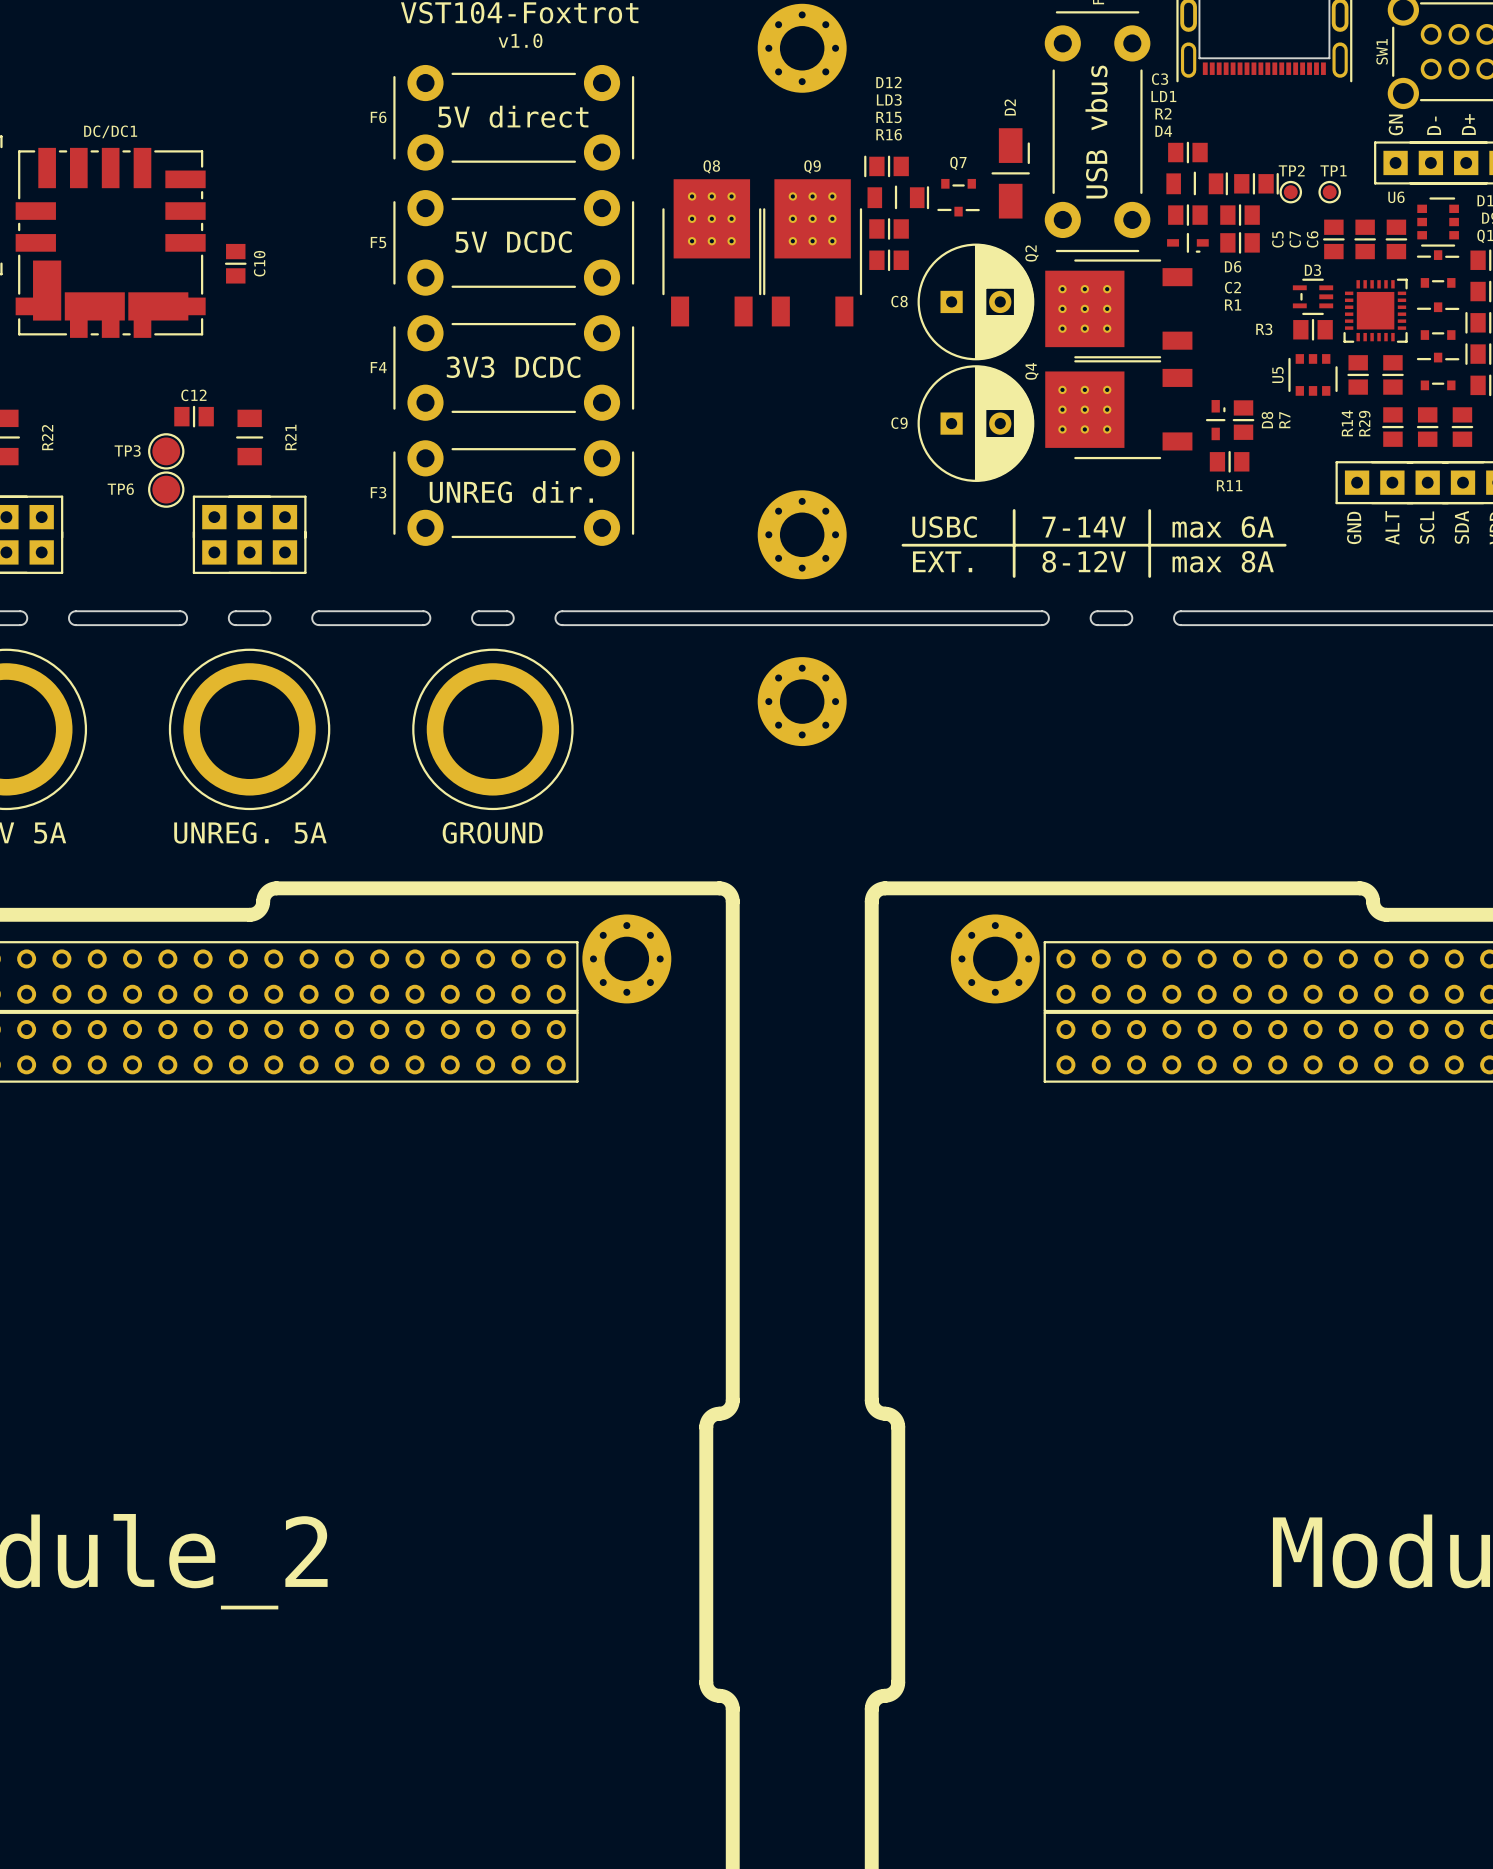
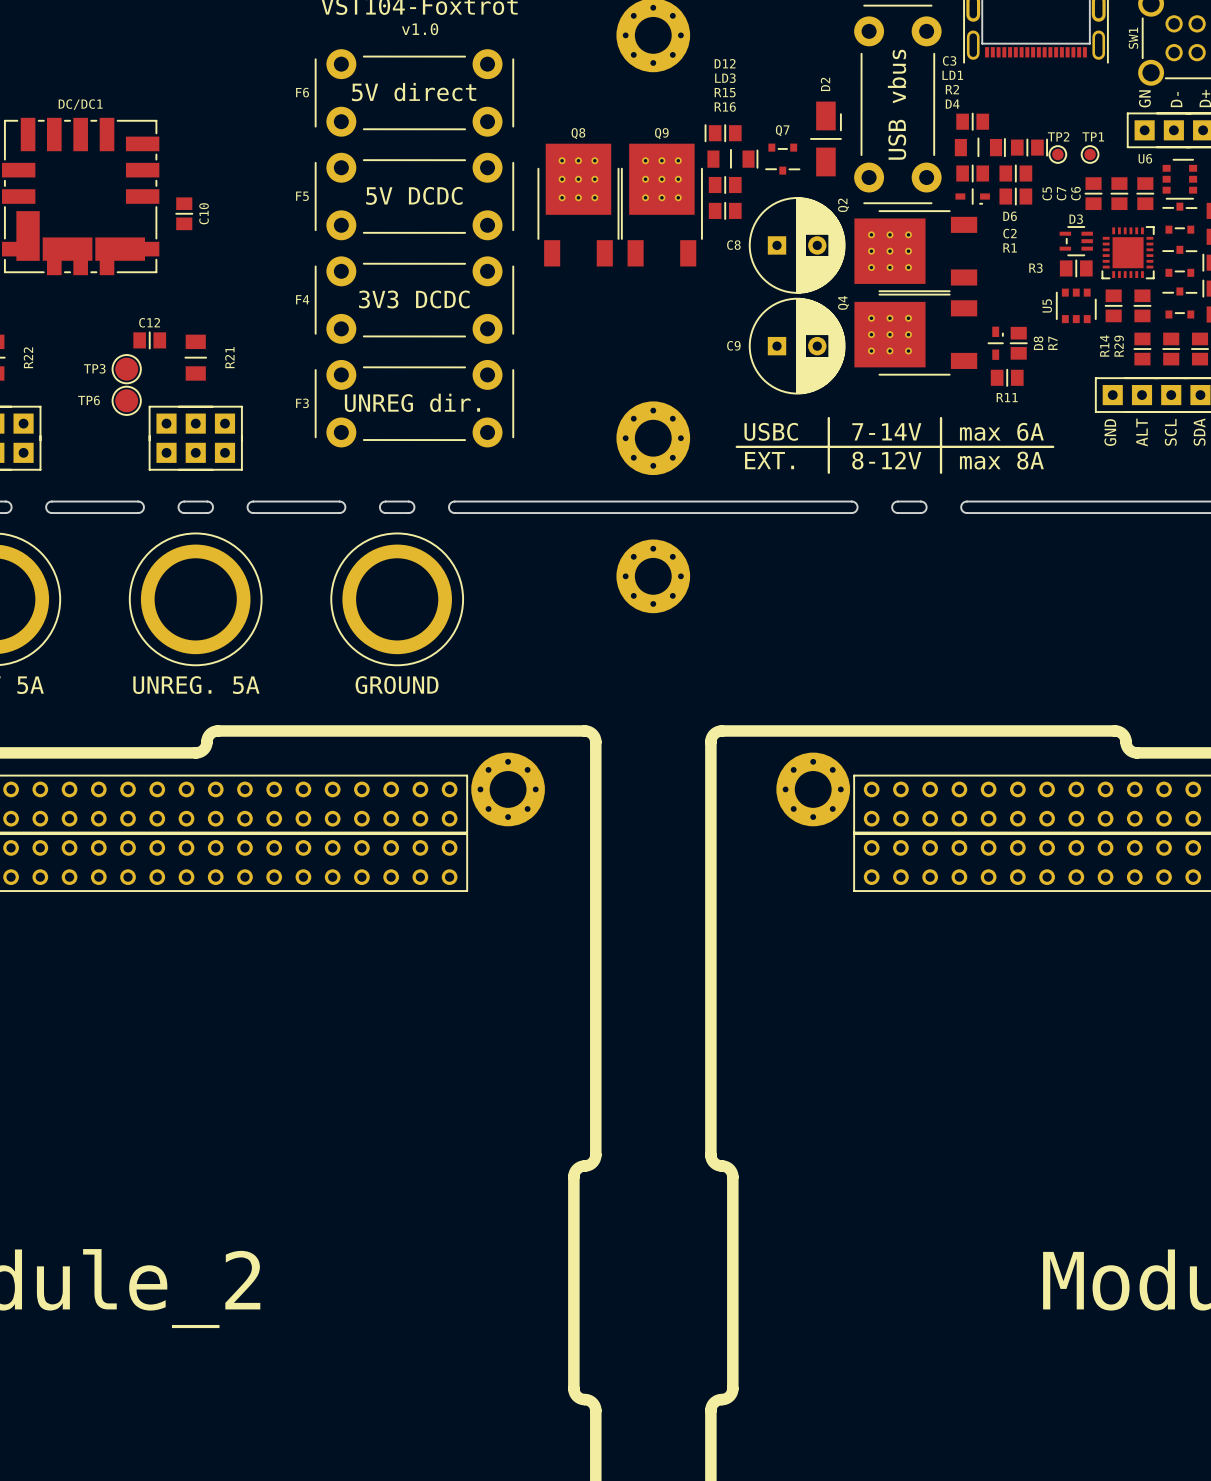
Q8 footprint: [662, 179, 762, 327] -> [537, 143, 620, 267]
Q9 footprint: [763, 179, 863, 327] -> [620, 143, 703, 267]
Q2 footprint: [1045, 259, 1193, 359] -> [854, 210, 978, 293]
Q4 footprint: [1045, 360, 1193, 460] -> [854, 293, 978, 376]

